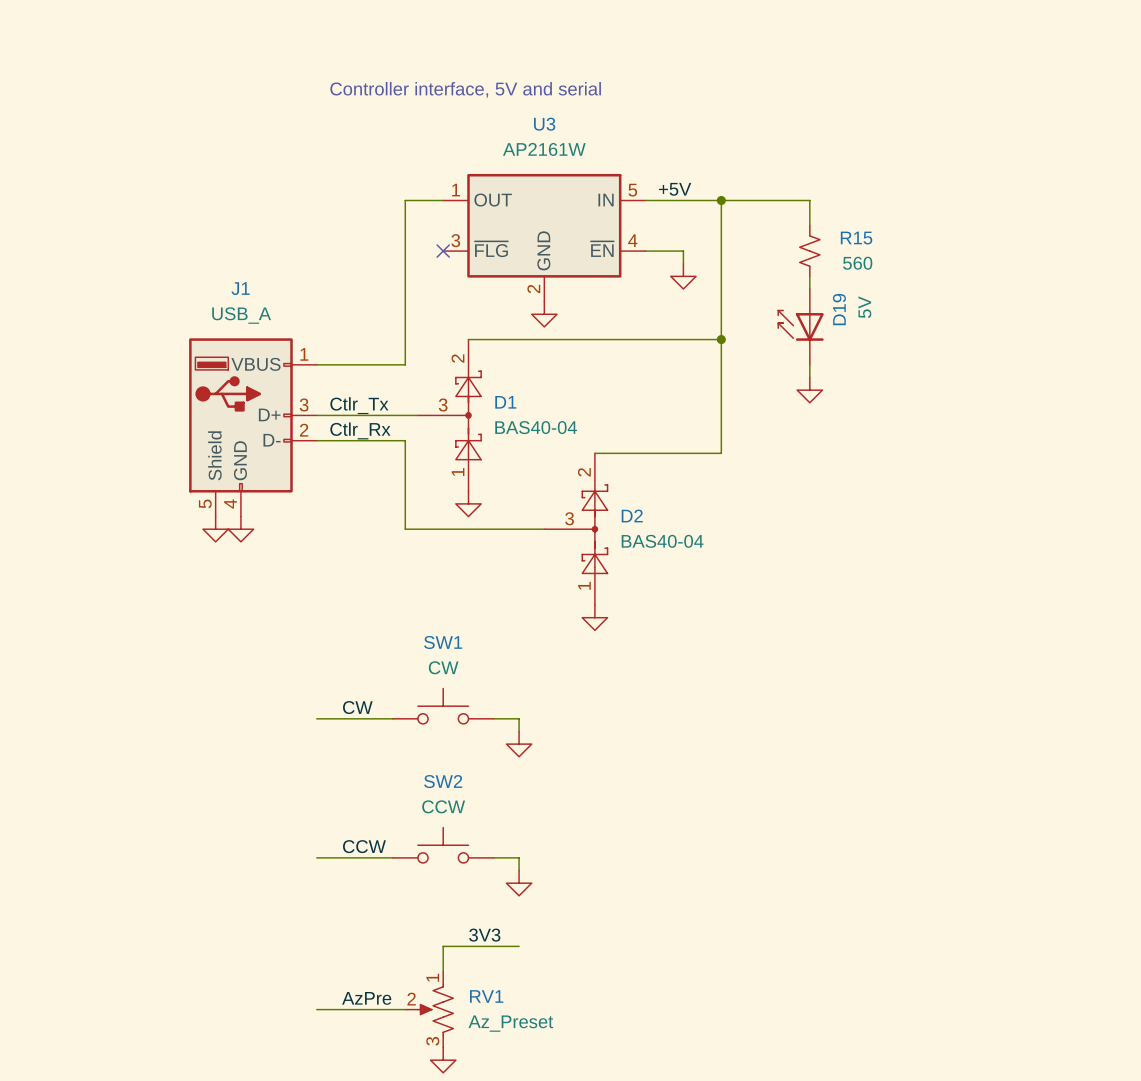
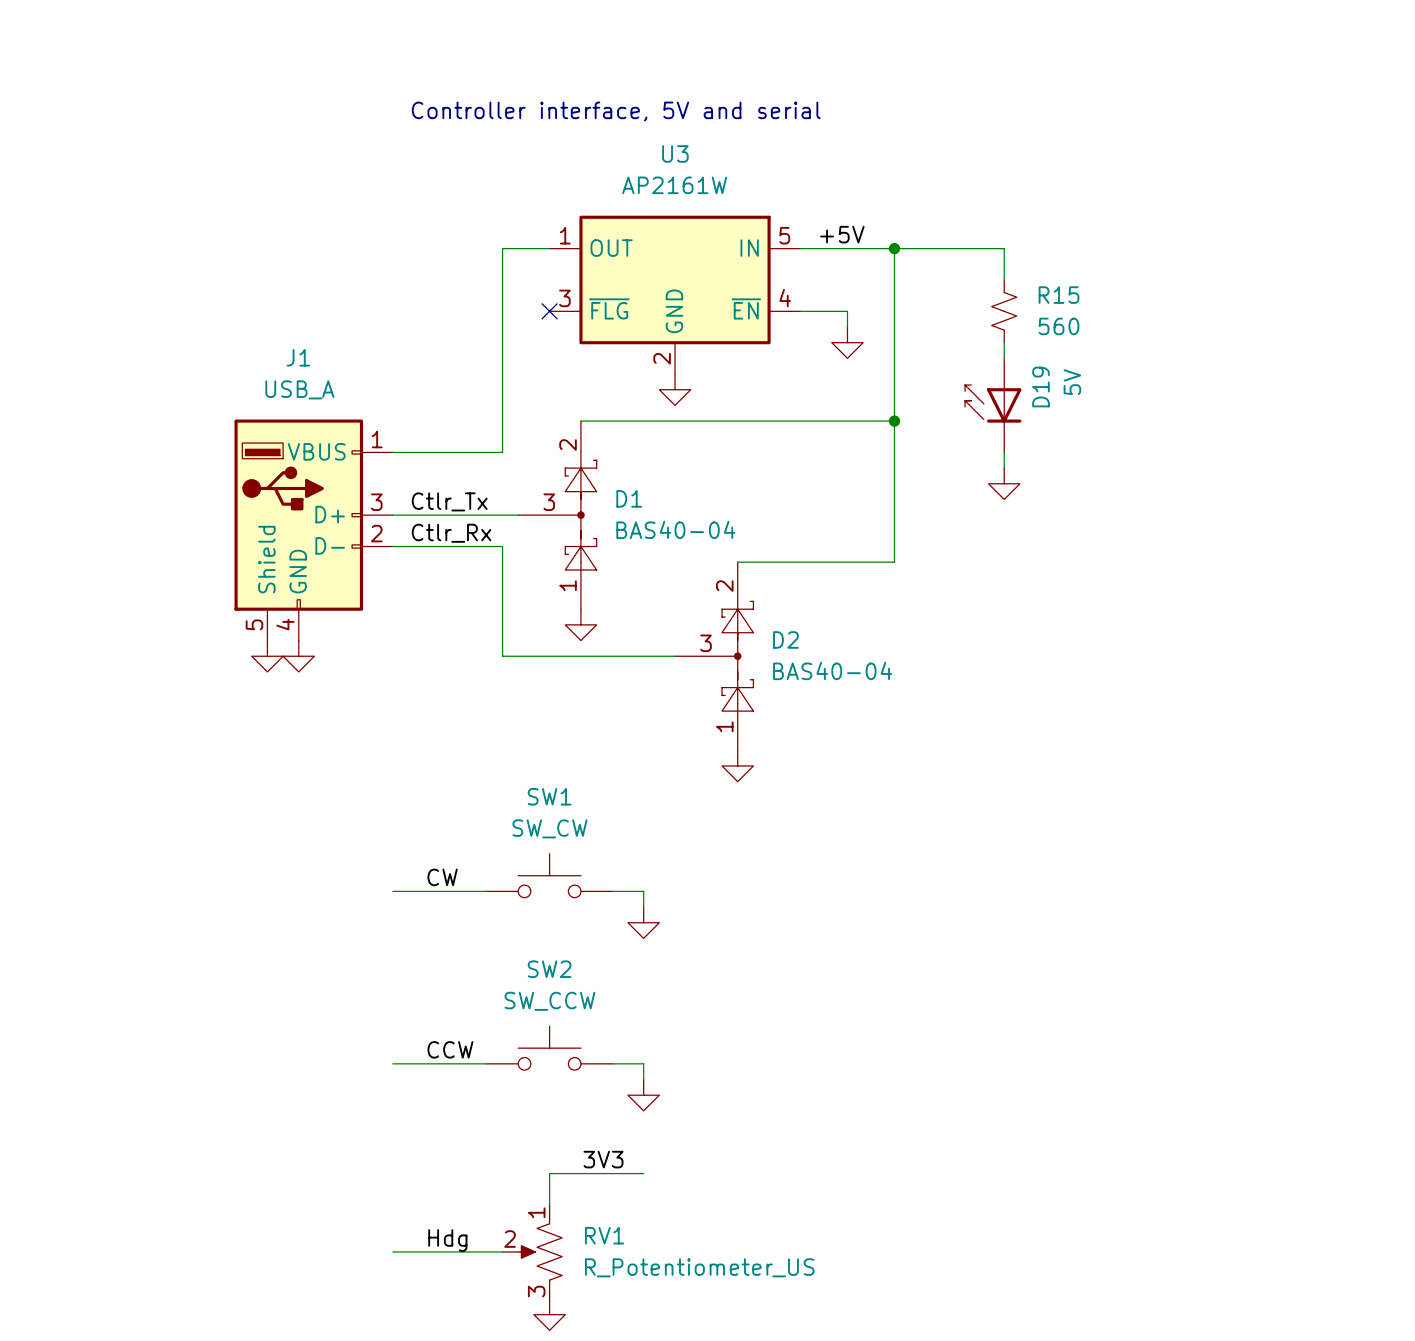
SW1 value: CW (443, 667) -> SW_CW (549, 828)
SW2 value: CCW (443, 806) -> SW_CCW (549, 1001)
label: AzPre (366, 998) -> Hdg (447, 1240)
RV1 value: Az_Preset (510, 1023) -> R_Potentiometer_US (699, 1267)

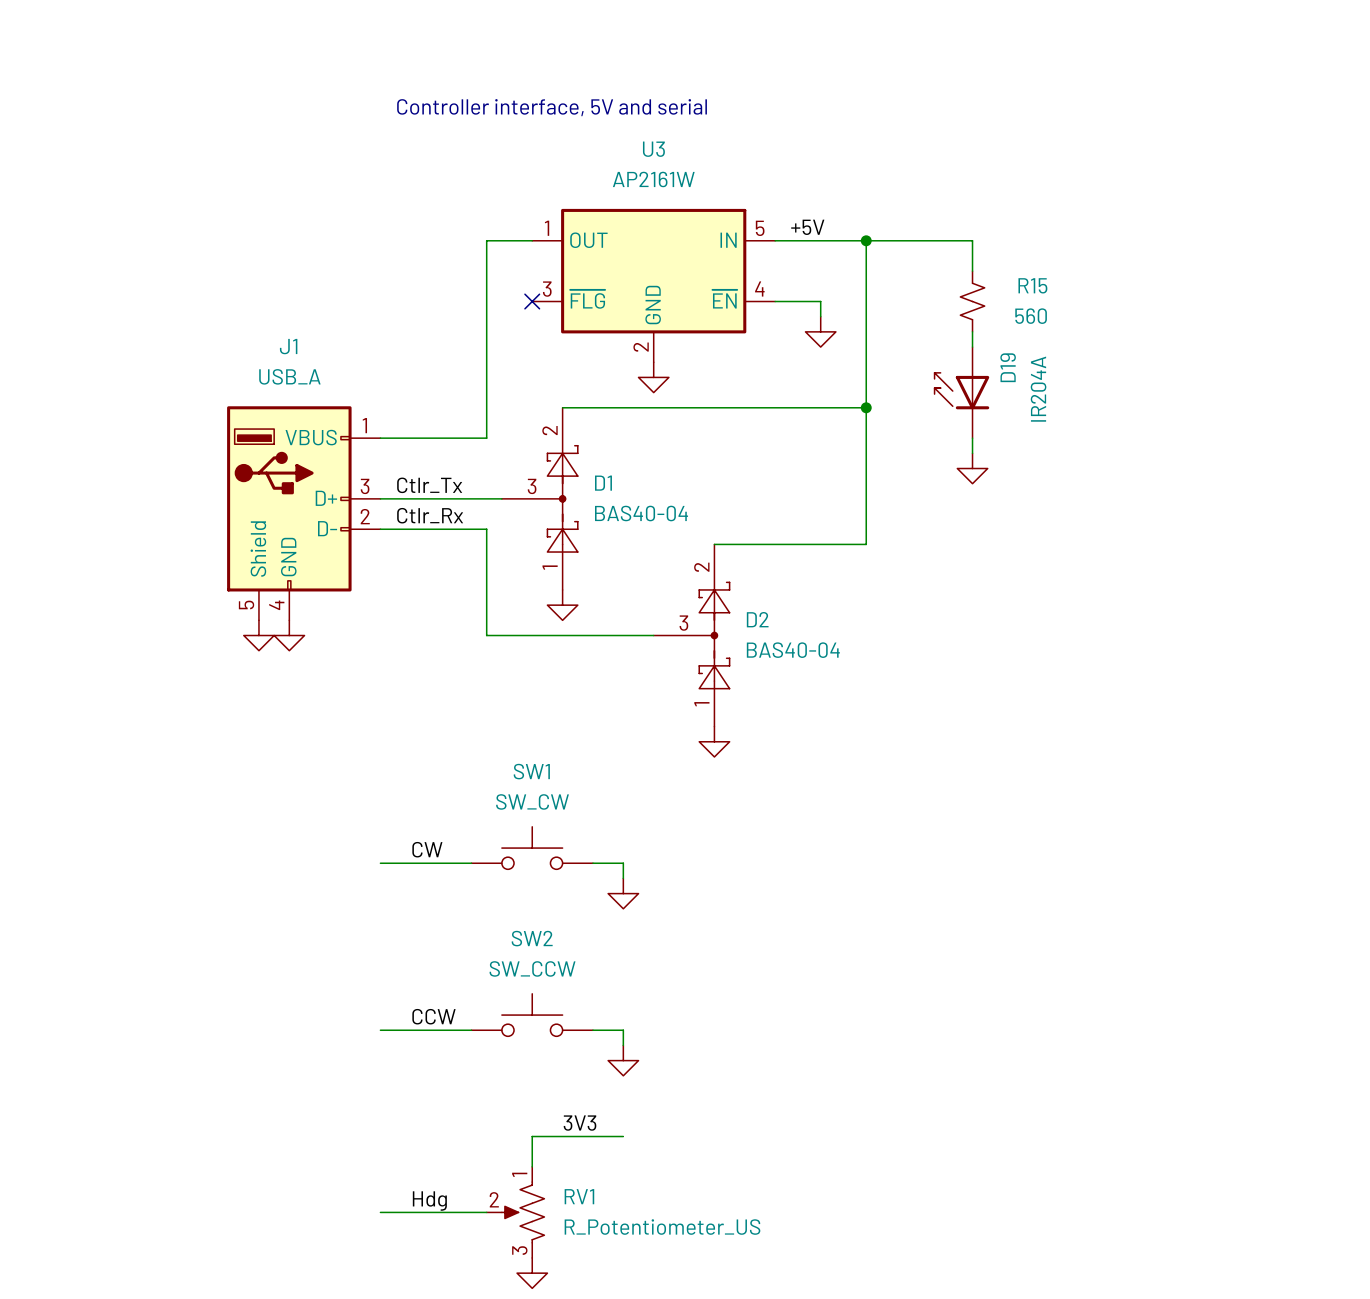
D19 value: 5V (1072, 382) -> IR204A (1038, 389)

